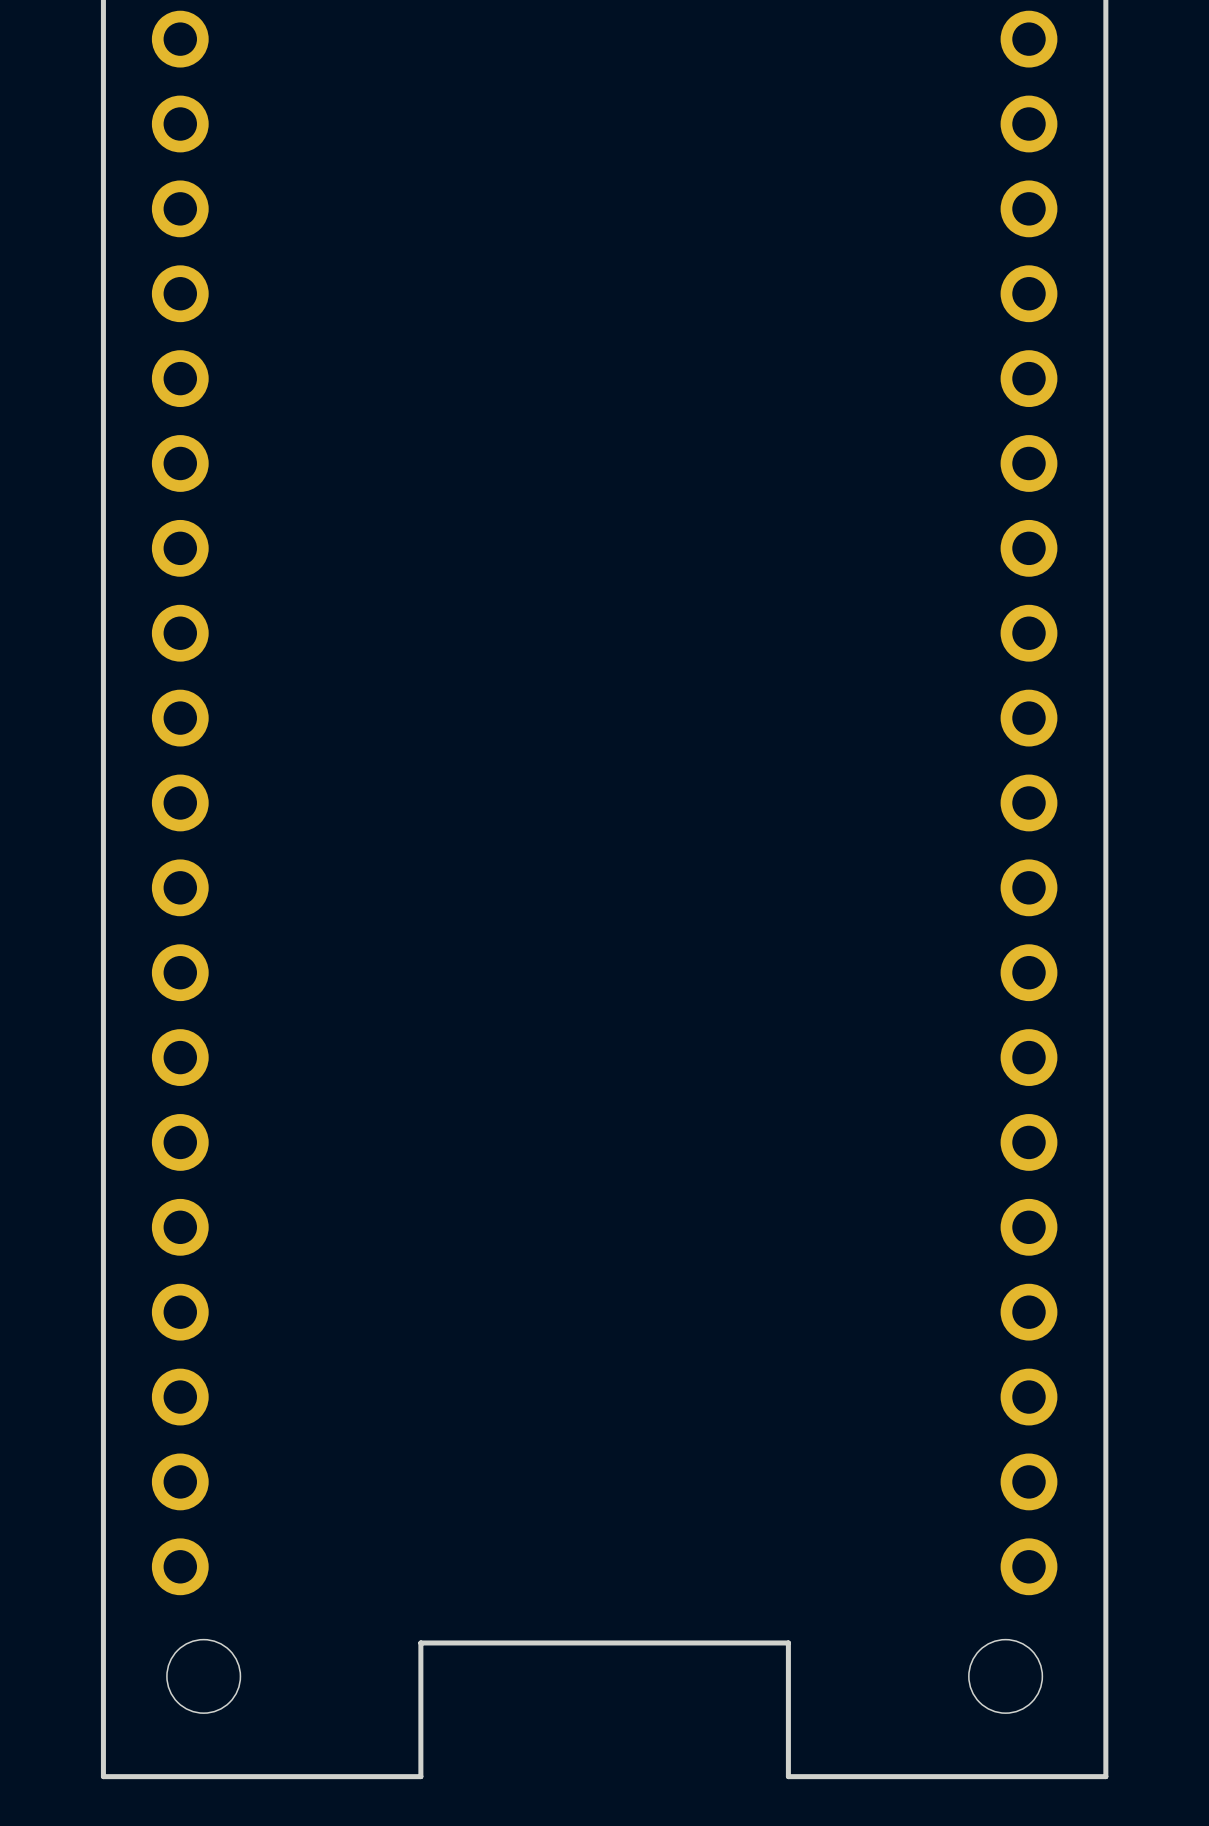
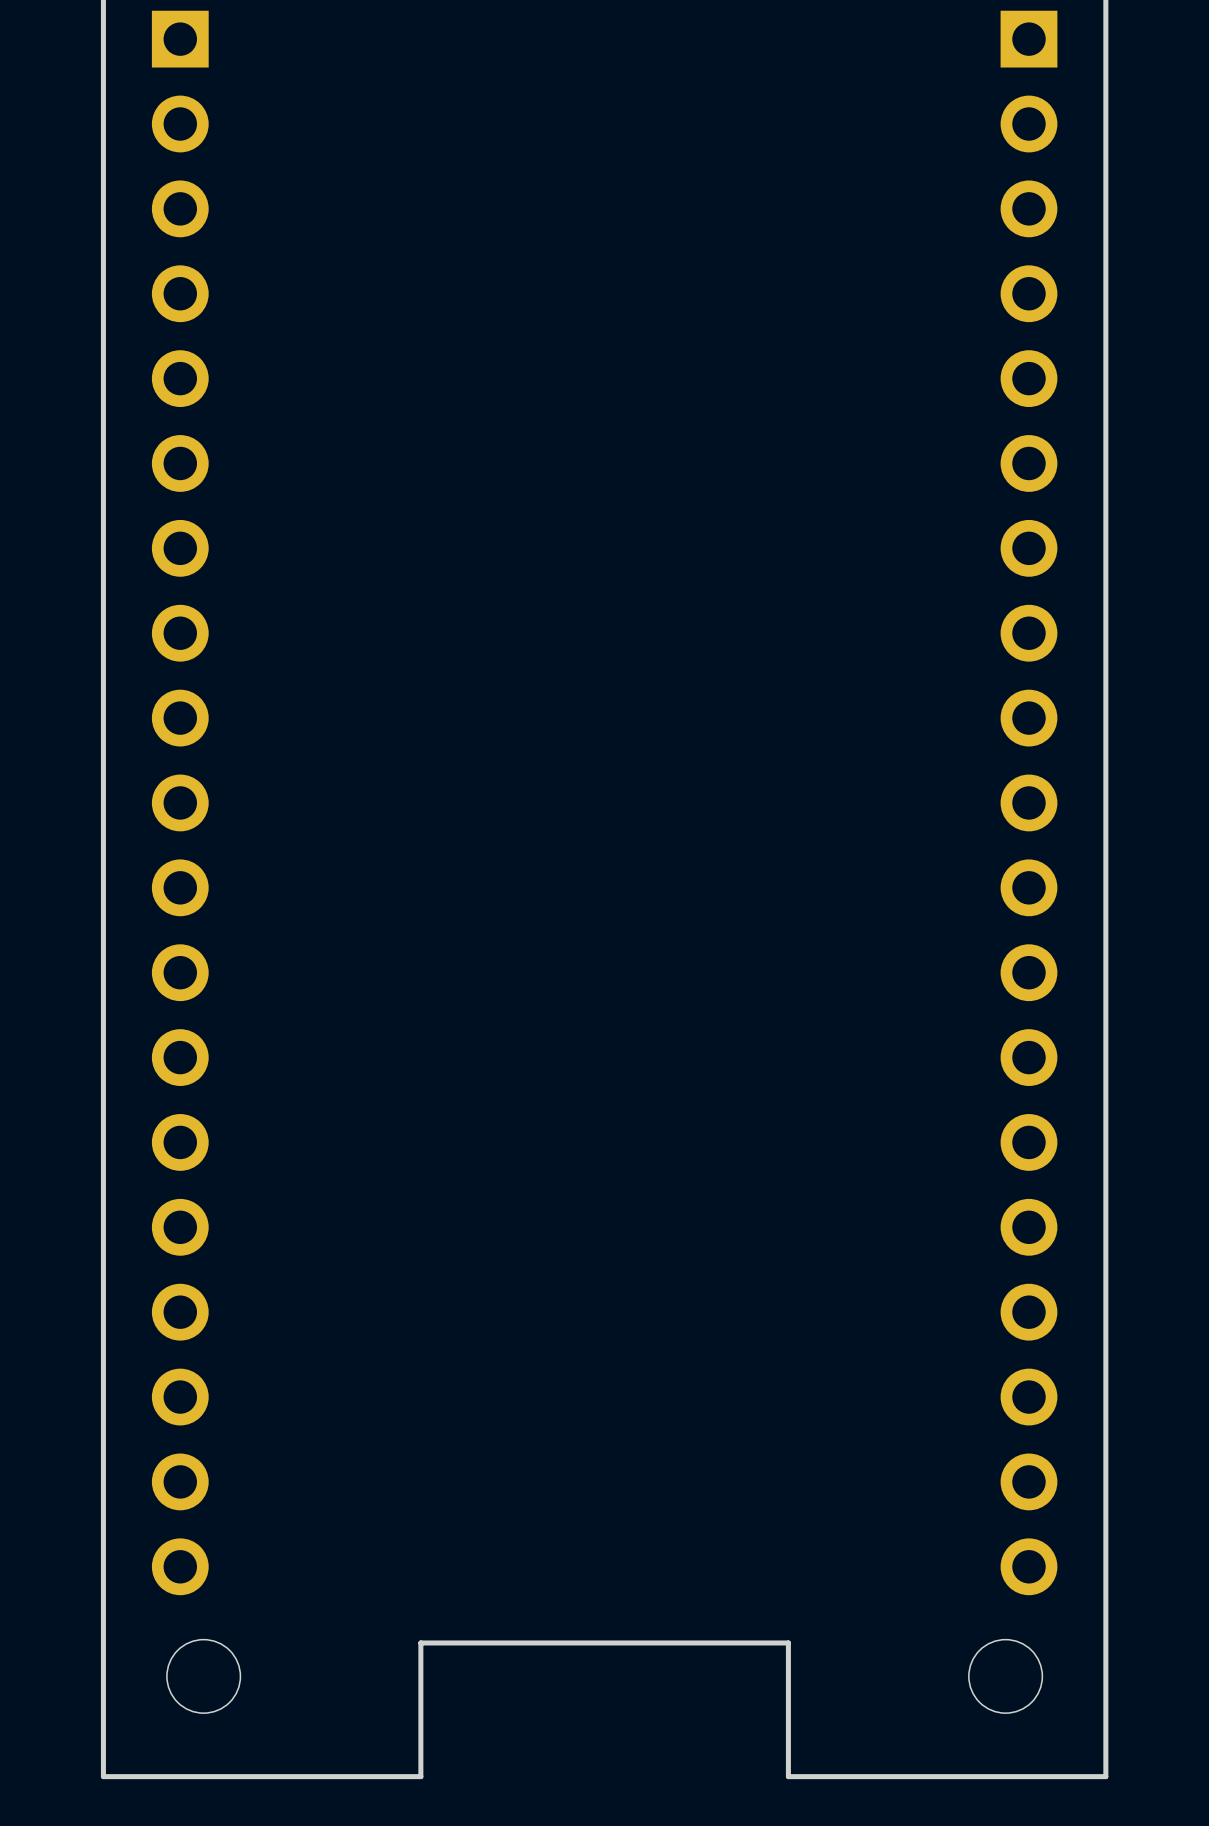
part footprint: [151, 10, 209, 1596] -> [151, 10, 209, 1596]
part footprint: [1000, 10, 1058, 1596] -> [1000, 10, 1058, 1596]

